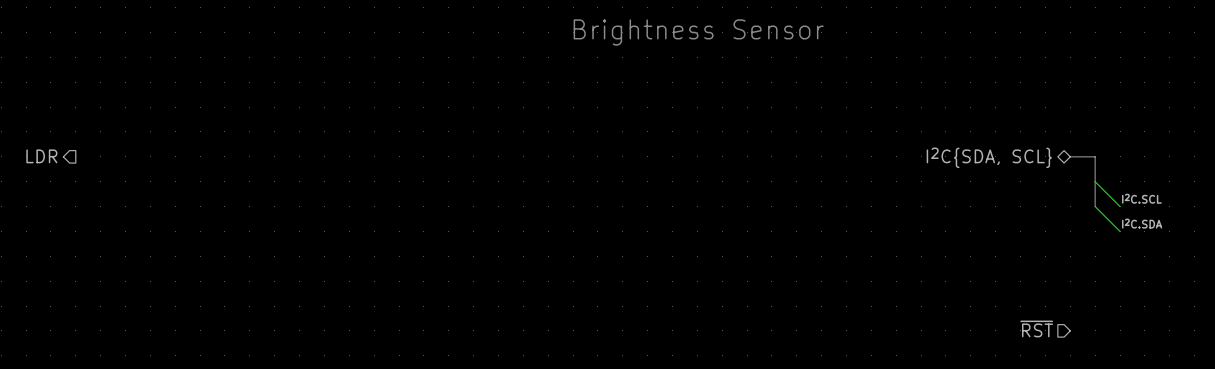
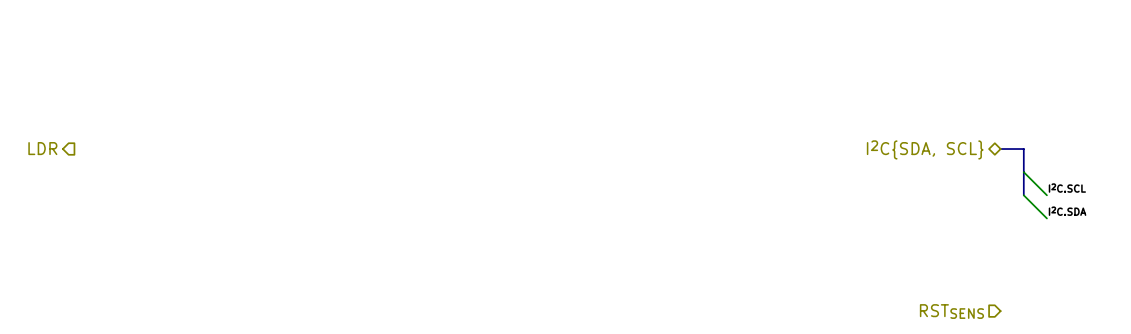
text: Brightness Sensor (698, 32) -> none
hierarchical label: ~{RST} (1036, 328) -> RSTSENS (951, 311)

